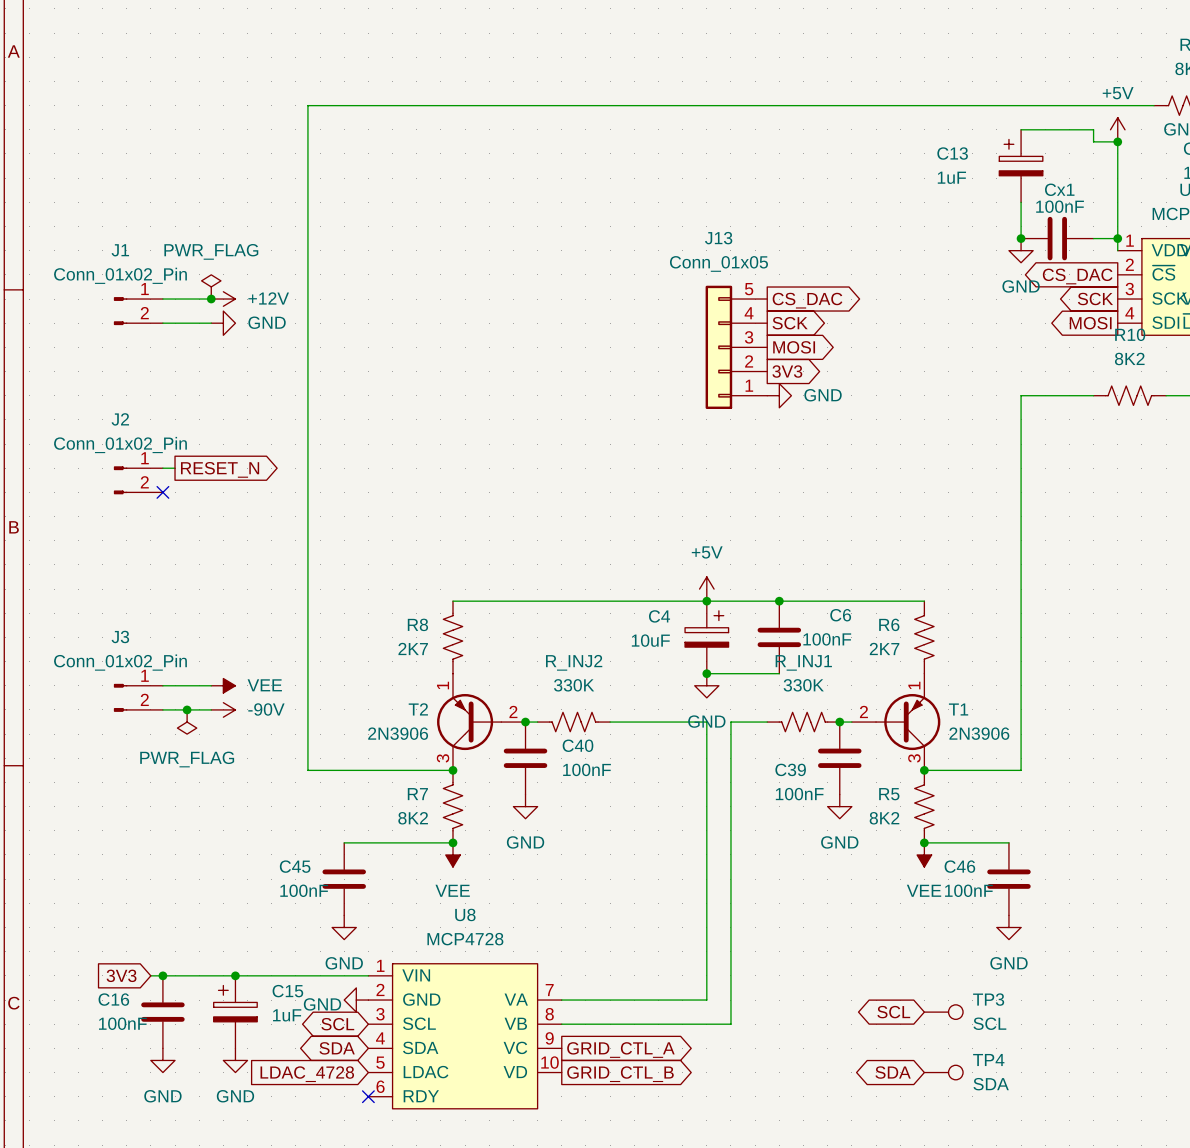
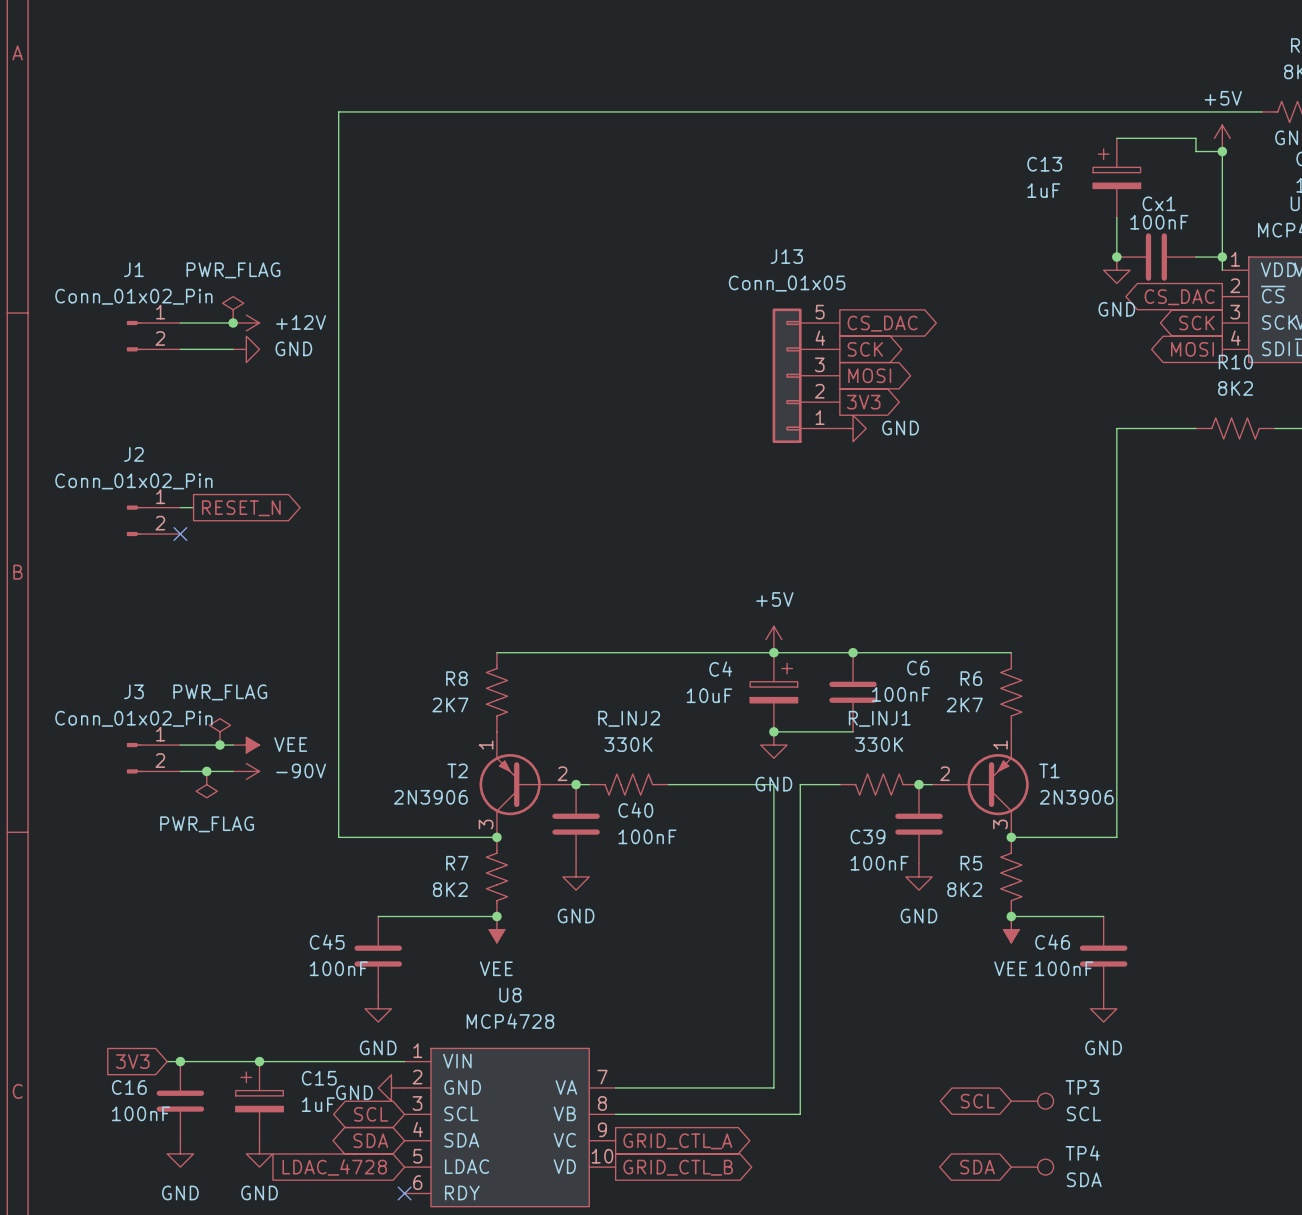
power symbol: none -> PWR_FLAG (219, 731)
junction: none -> (219, 745)

